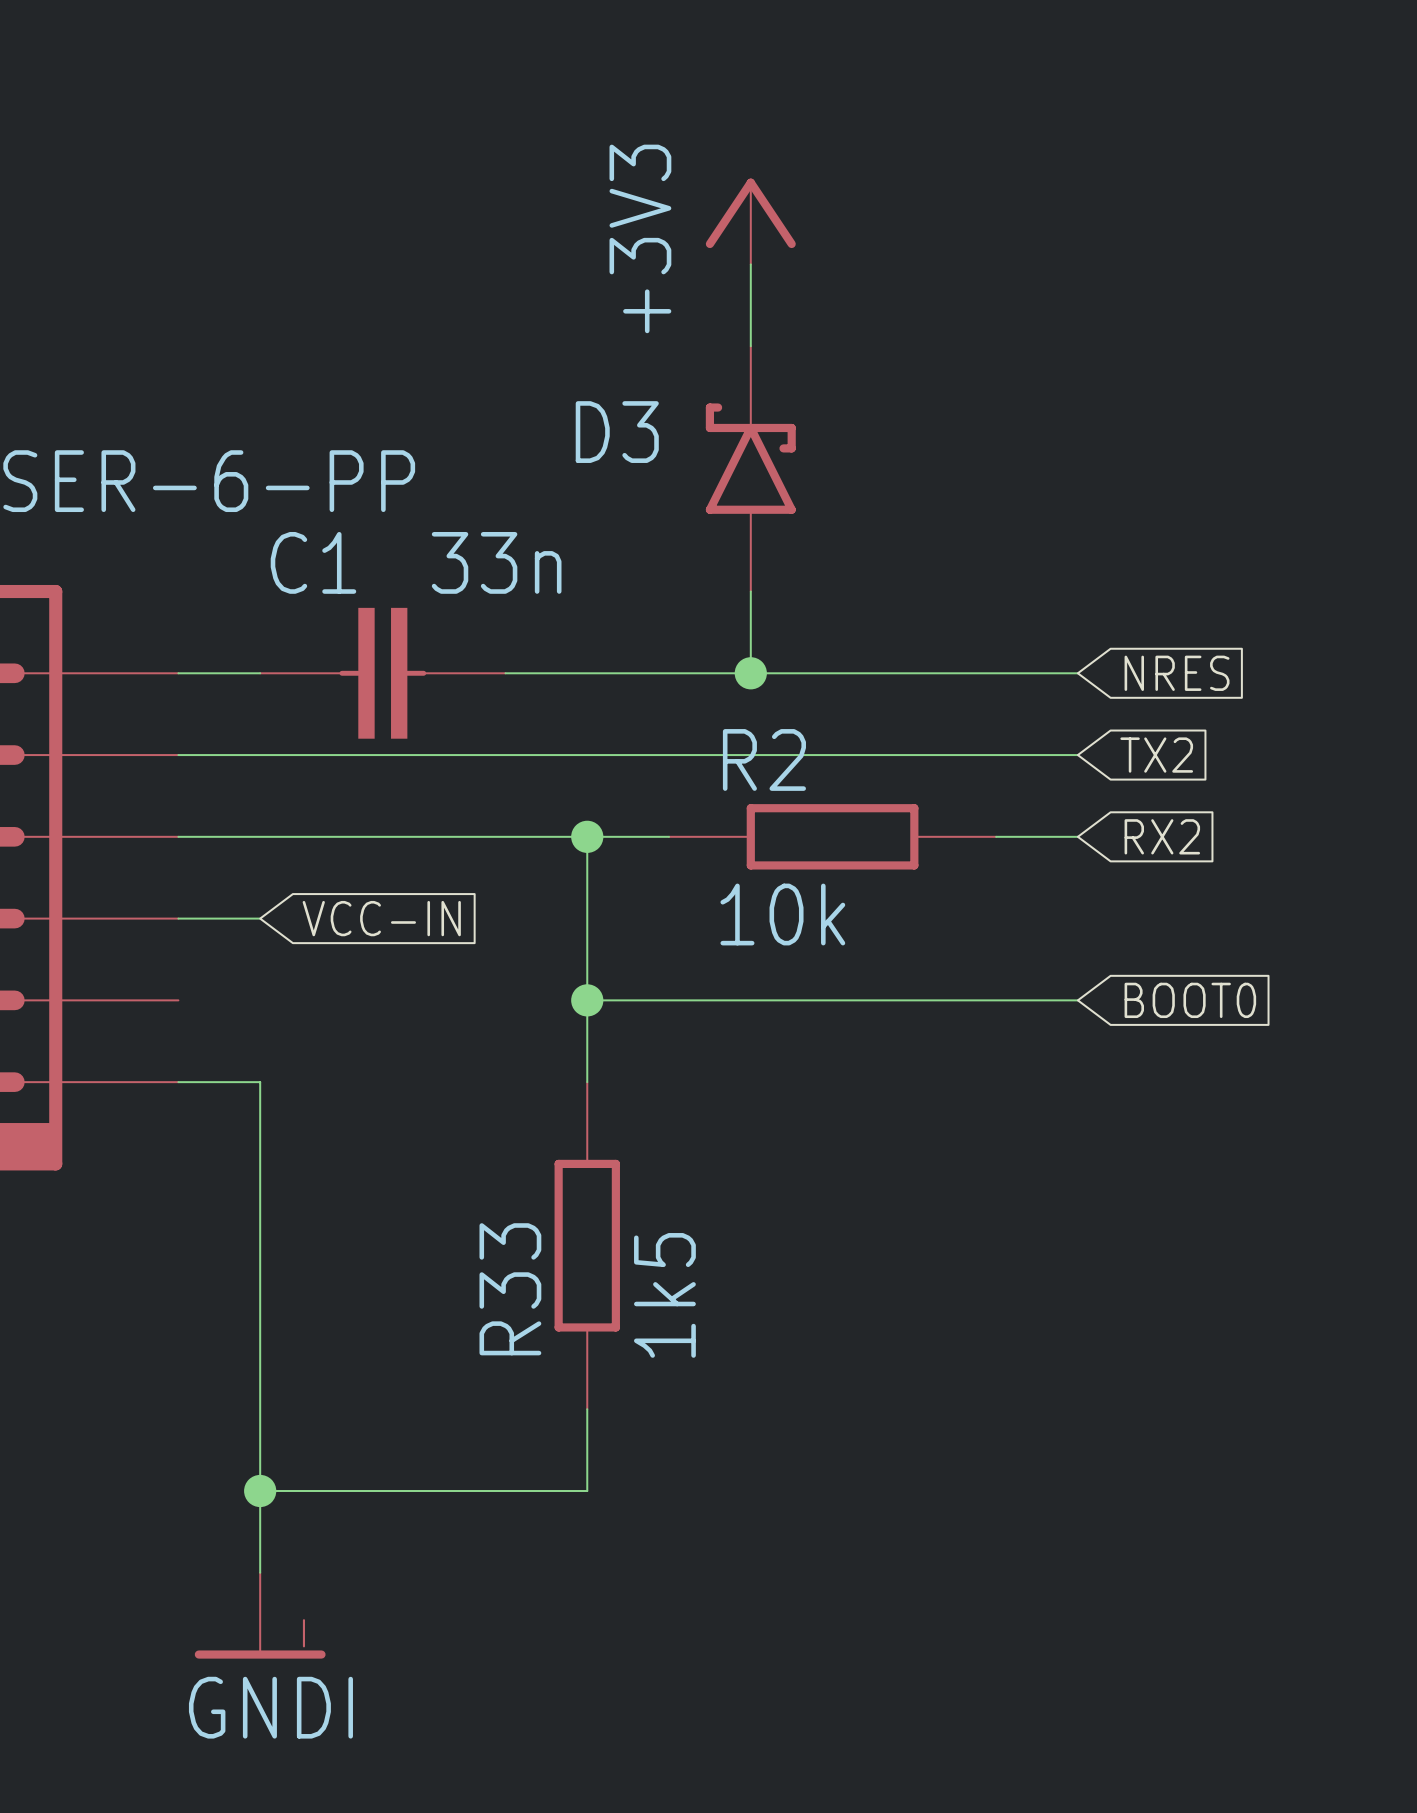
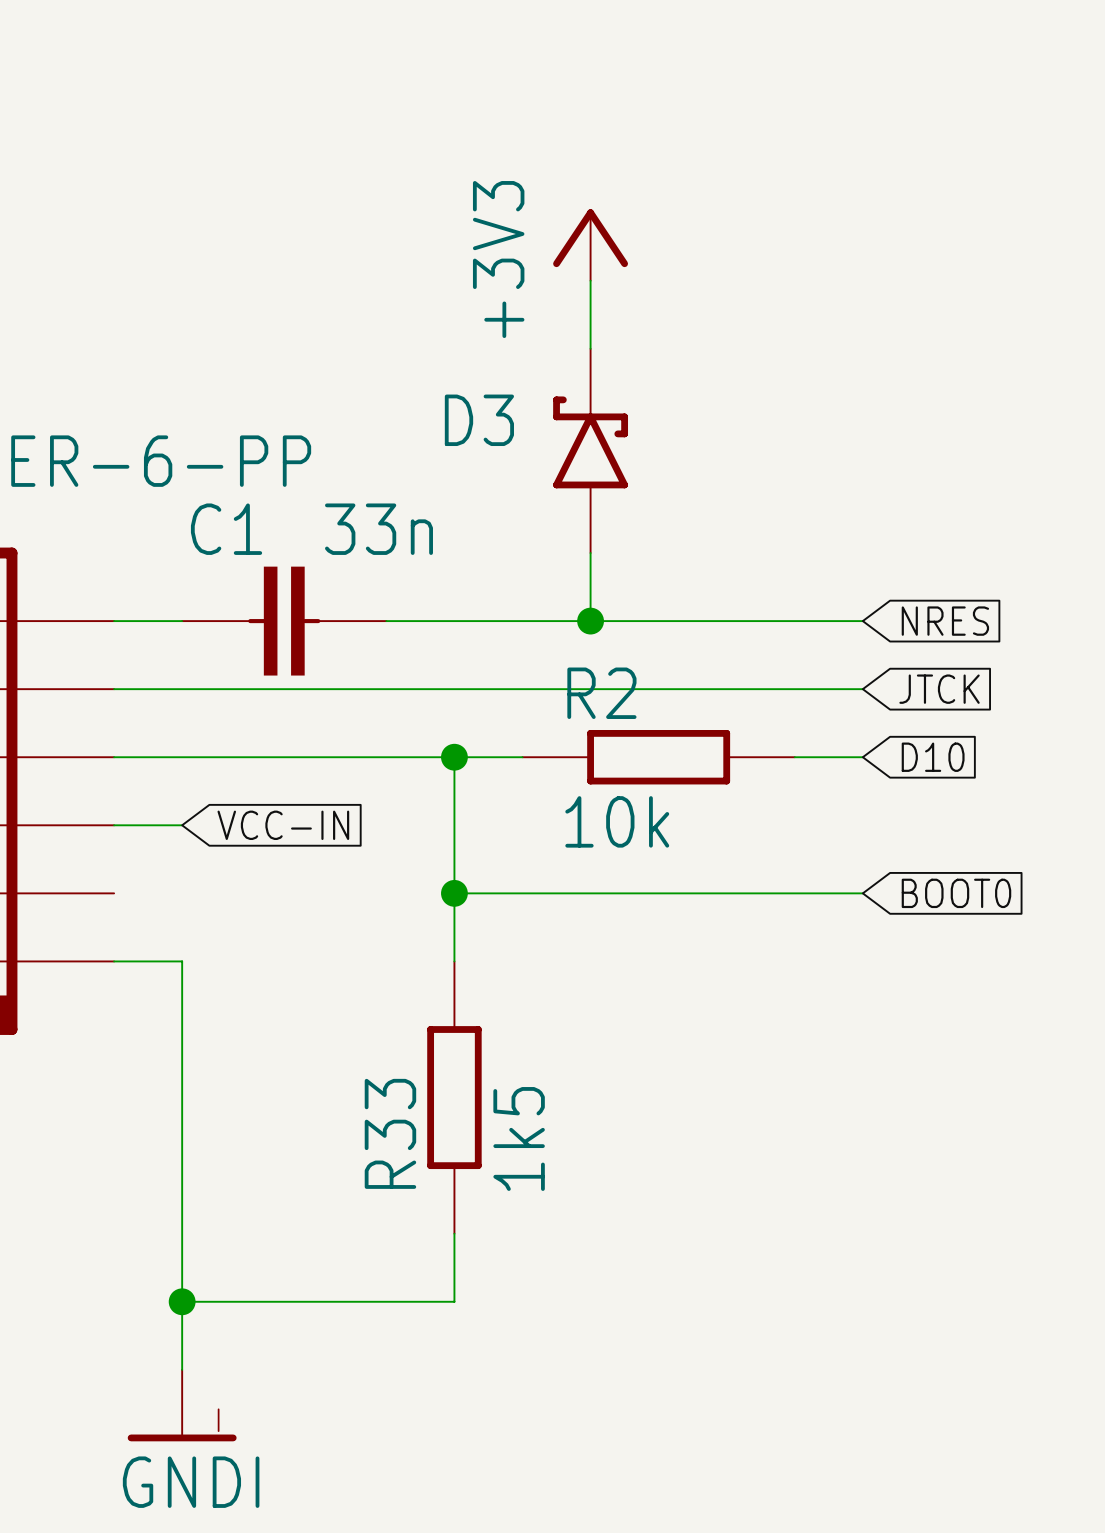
global label: TX2 (1156, 755) -> JTCK (939, 689)
global label: RX2 (1162, 836) -> D10 (933, 757)

